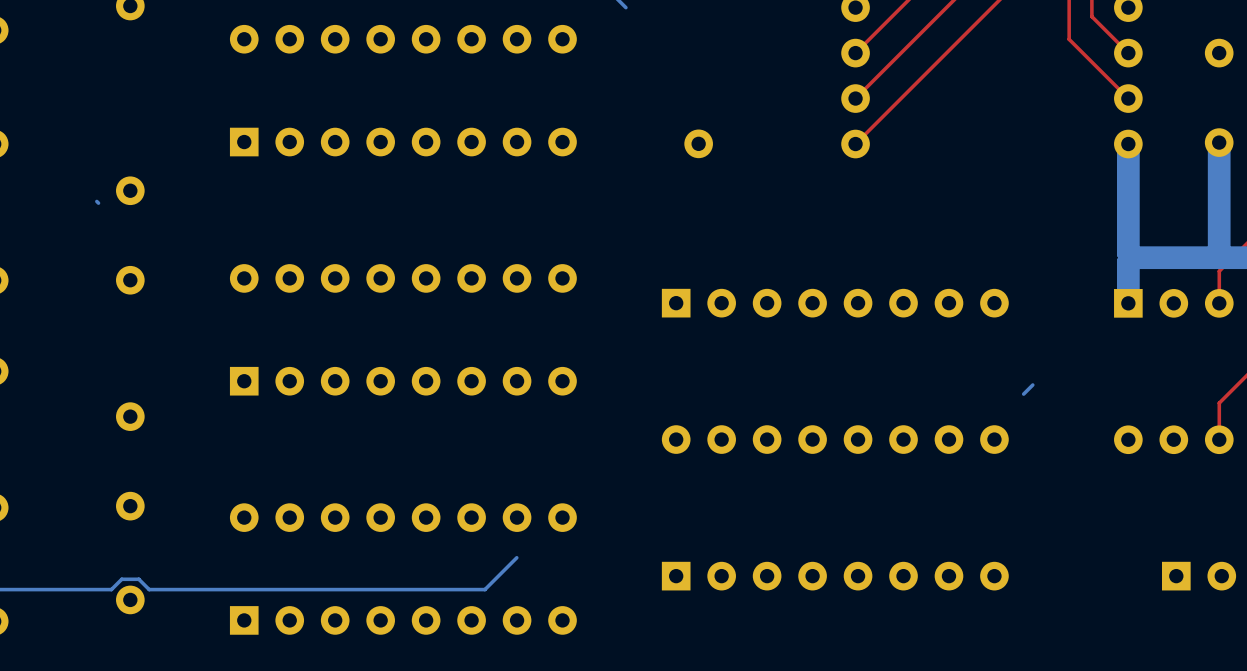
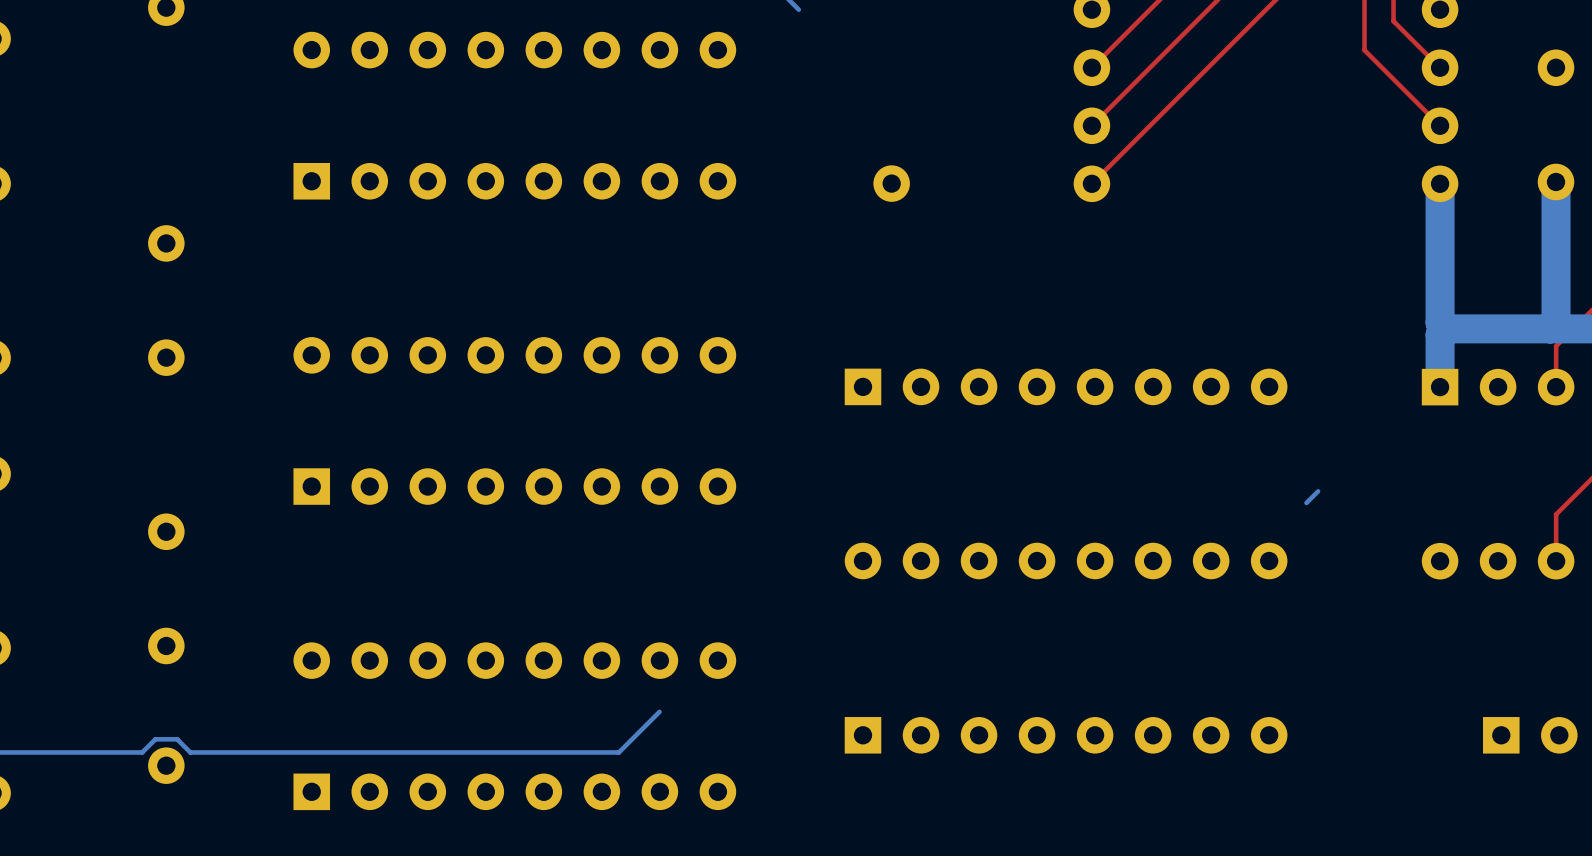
bottom track: (96, 201) (98, 203) -> none

